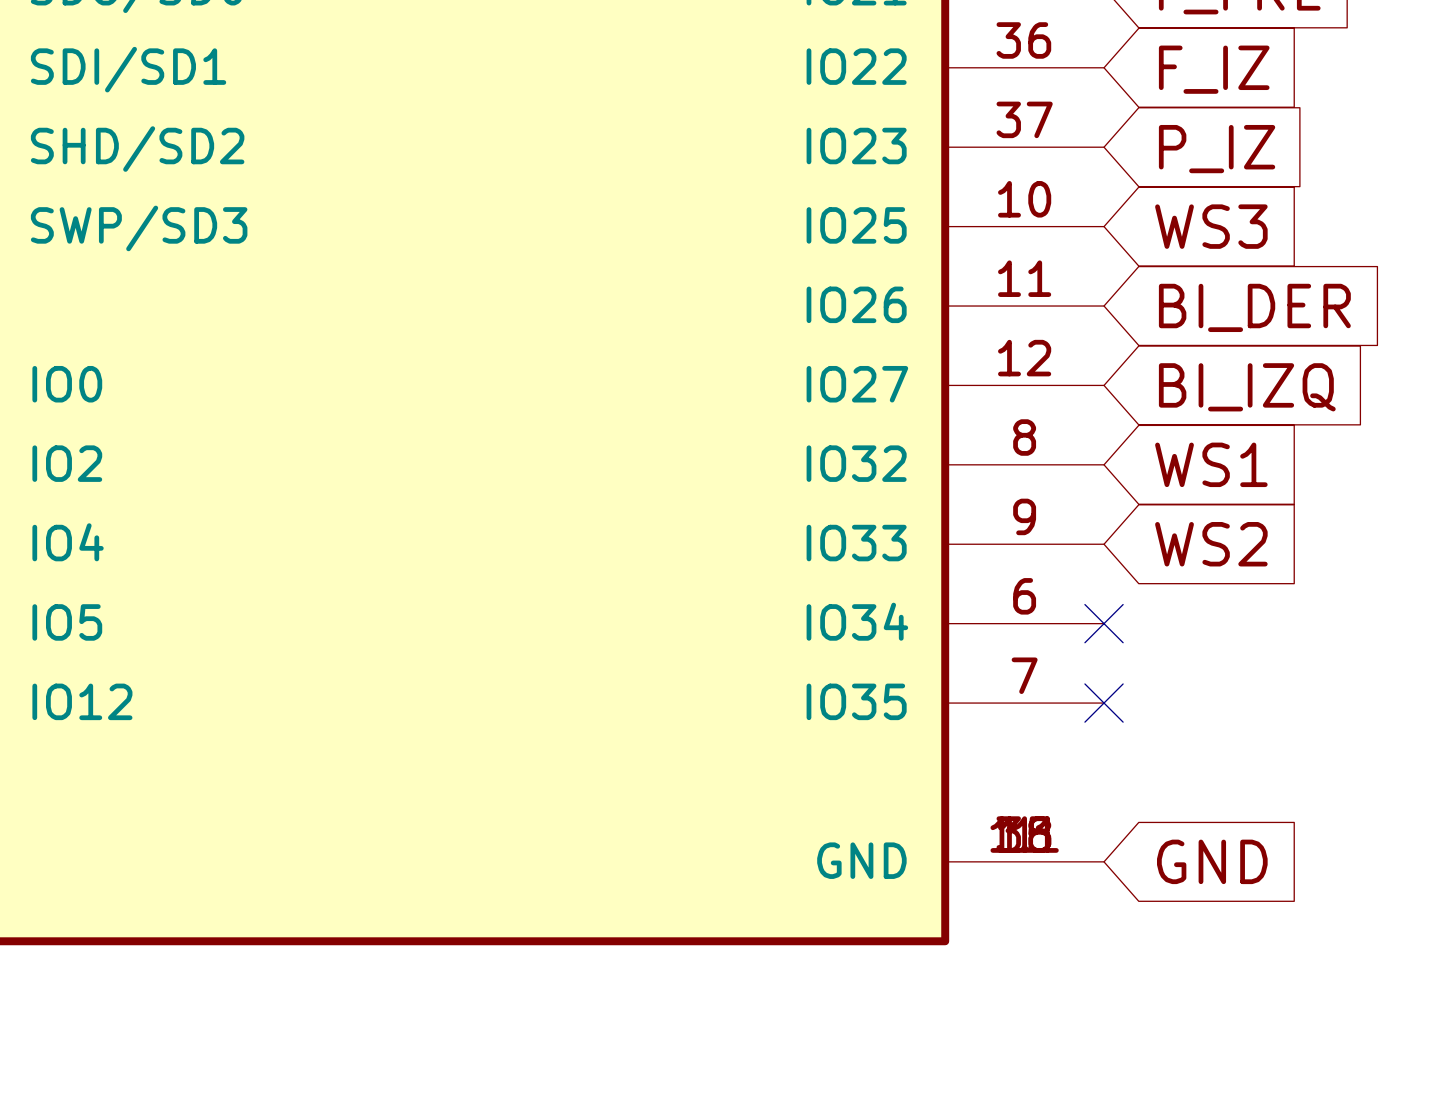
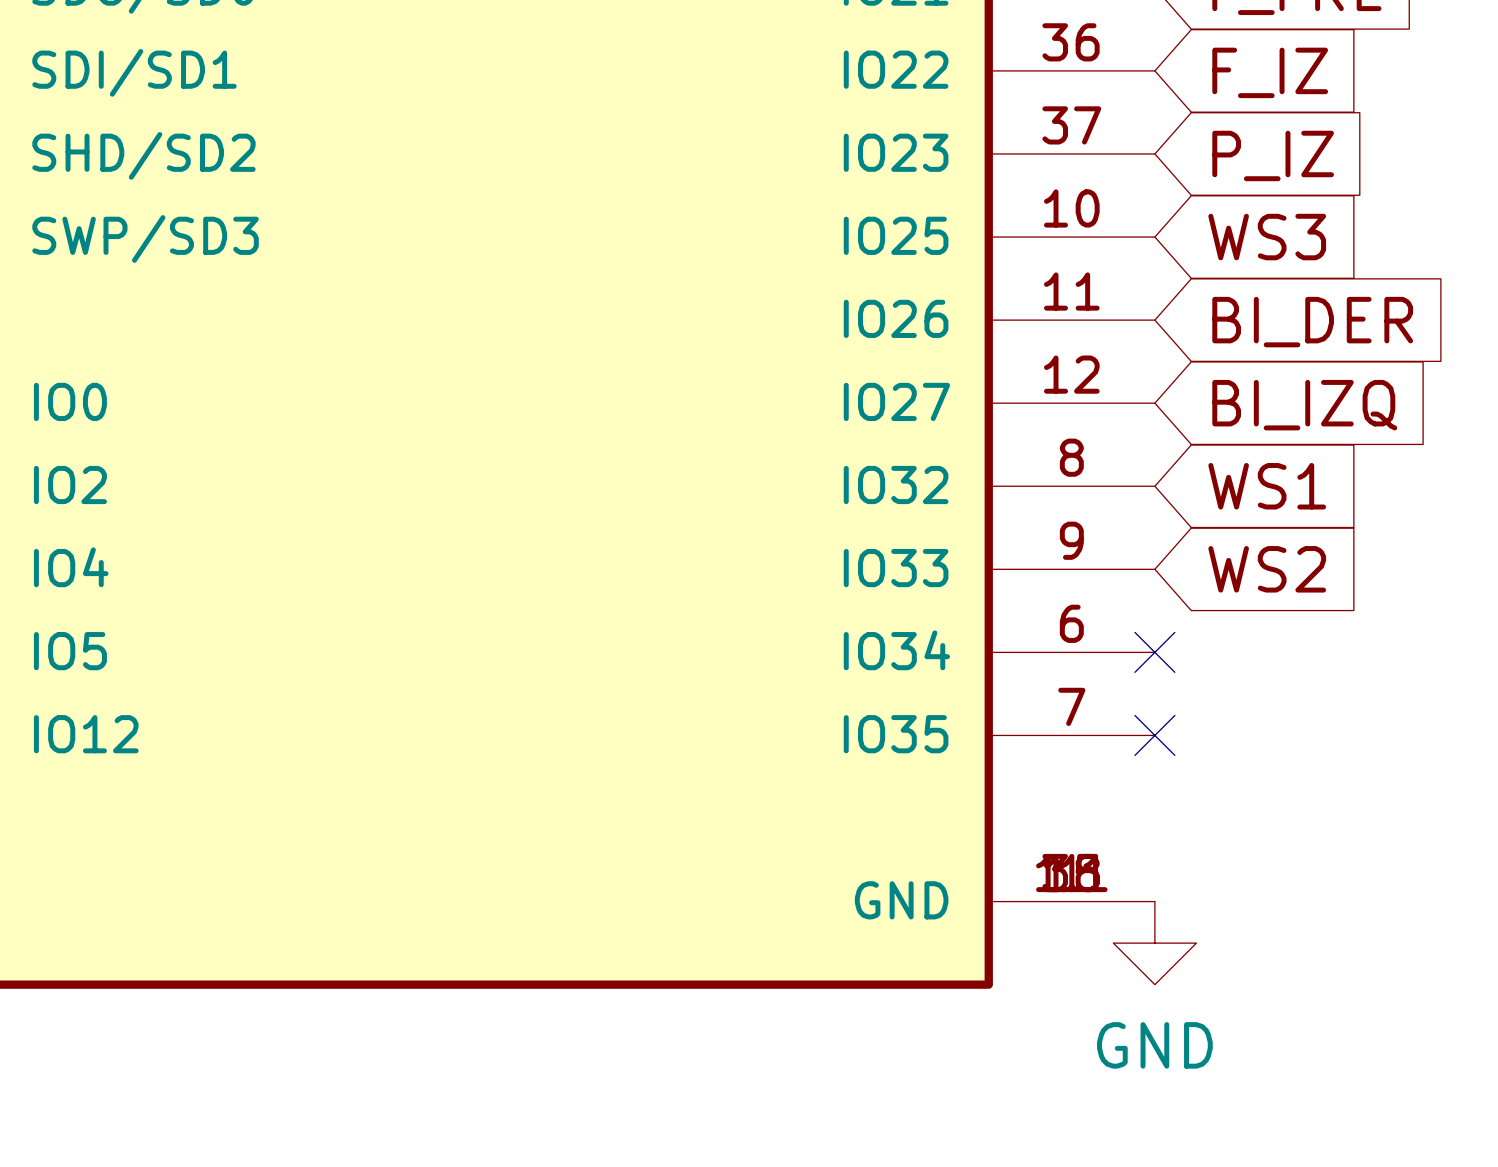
global label: GND (1212, 861) -> none
power symbol: none -> GND (1154, 943)

